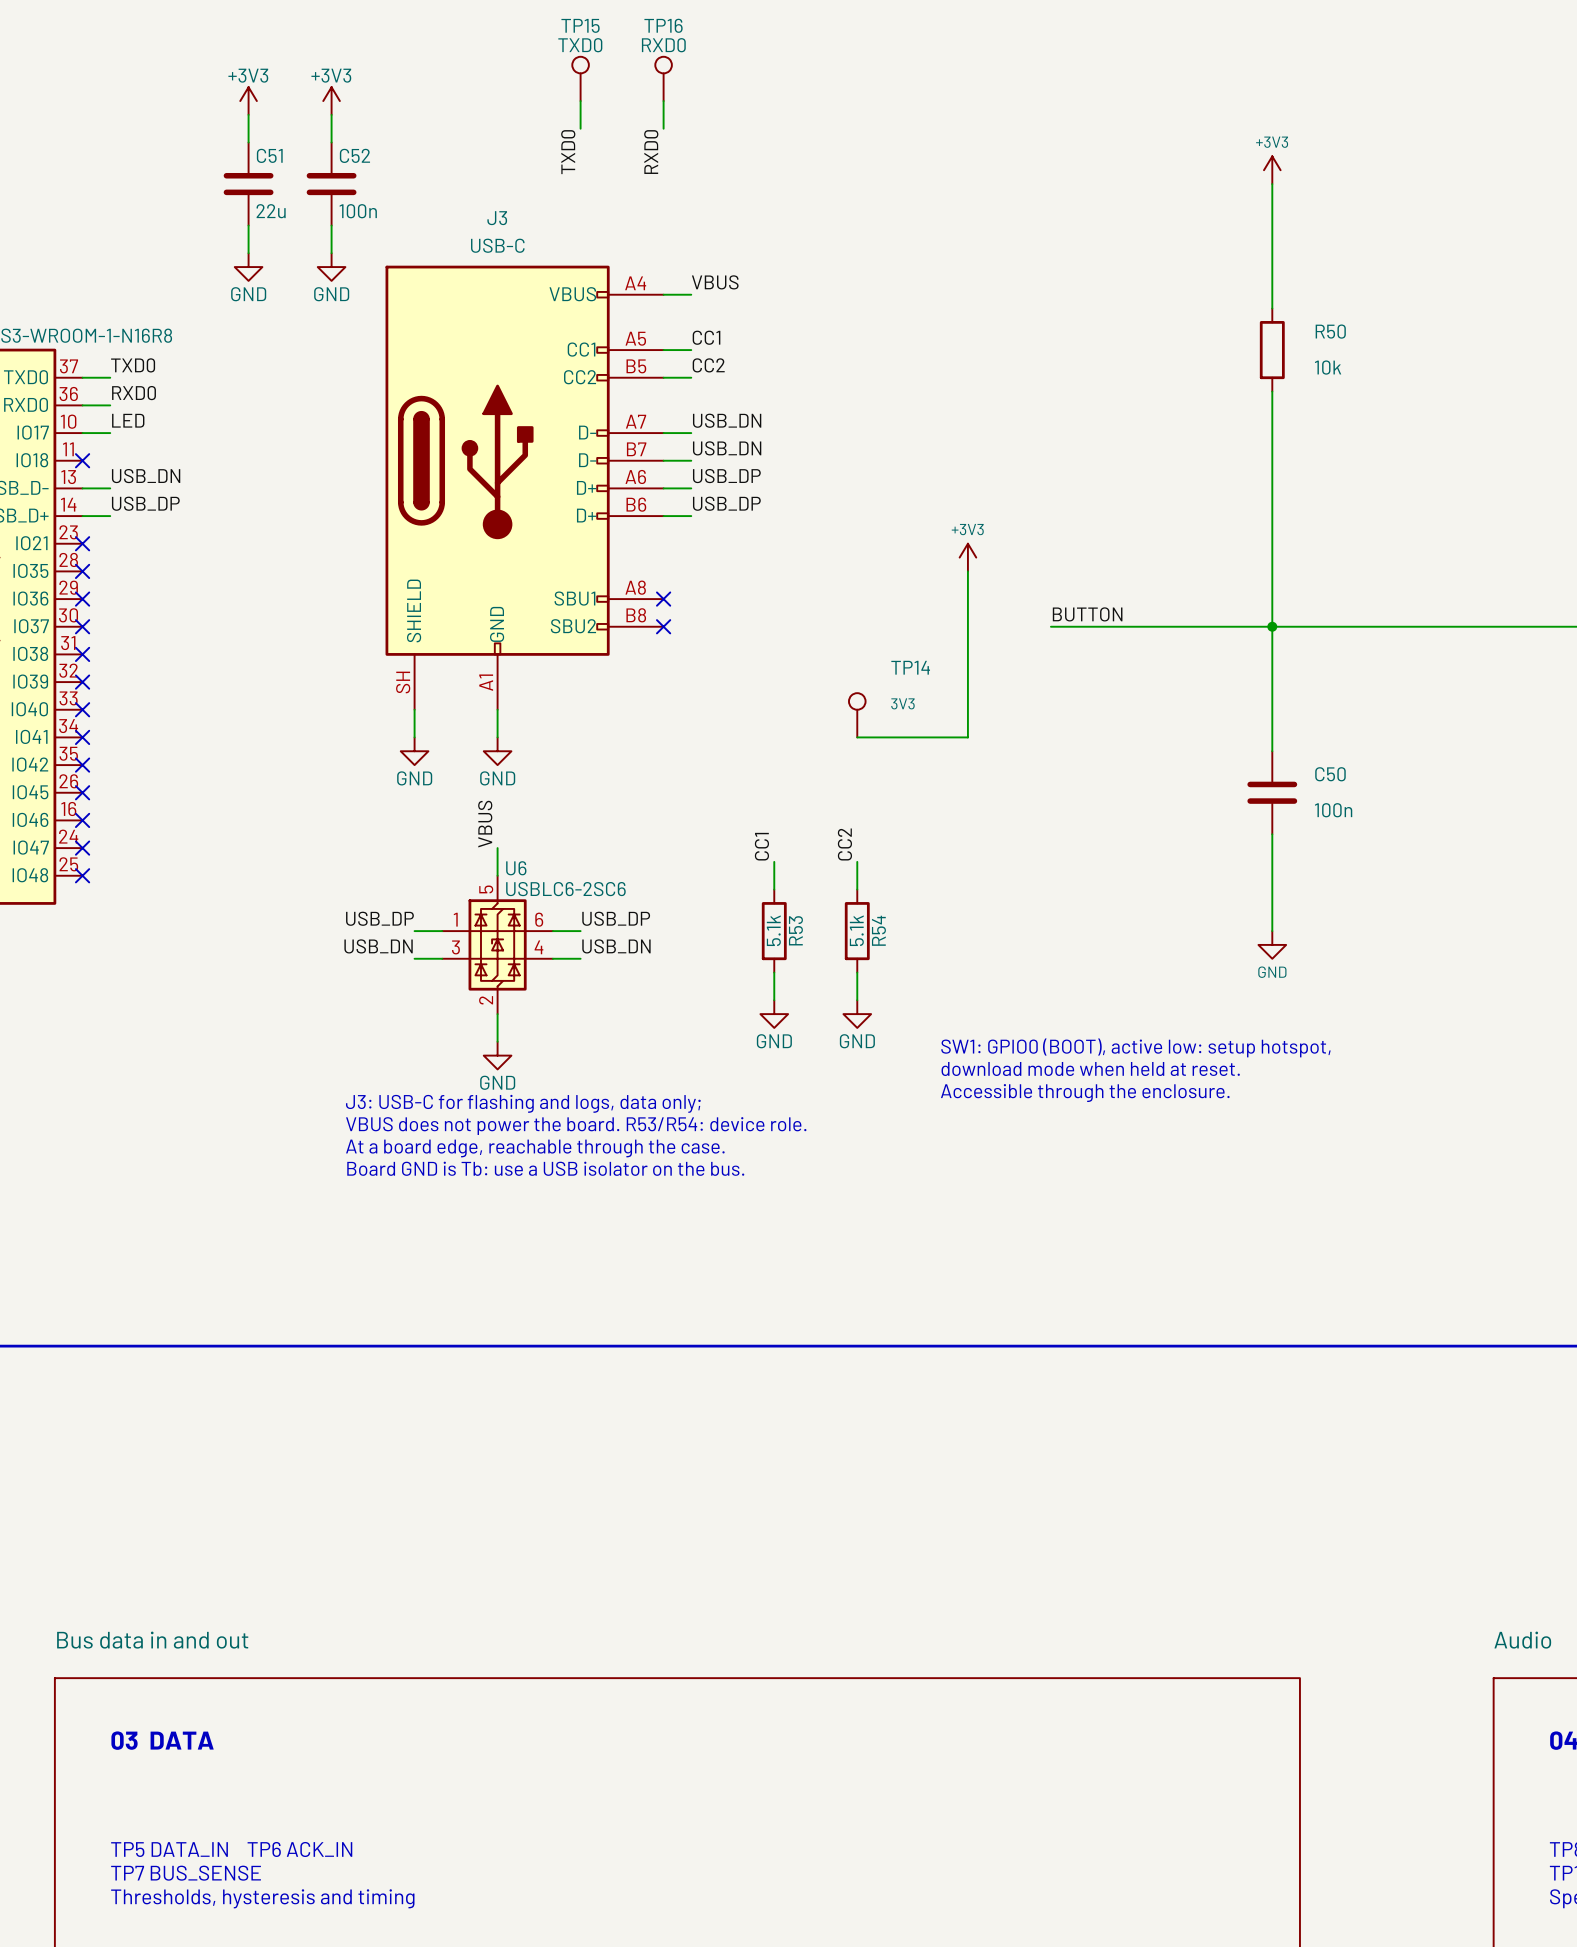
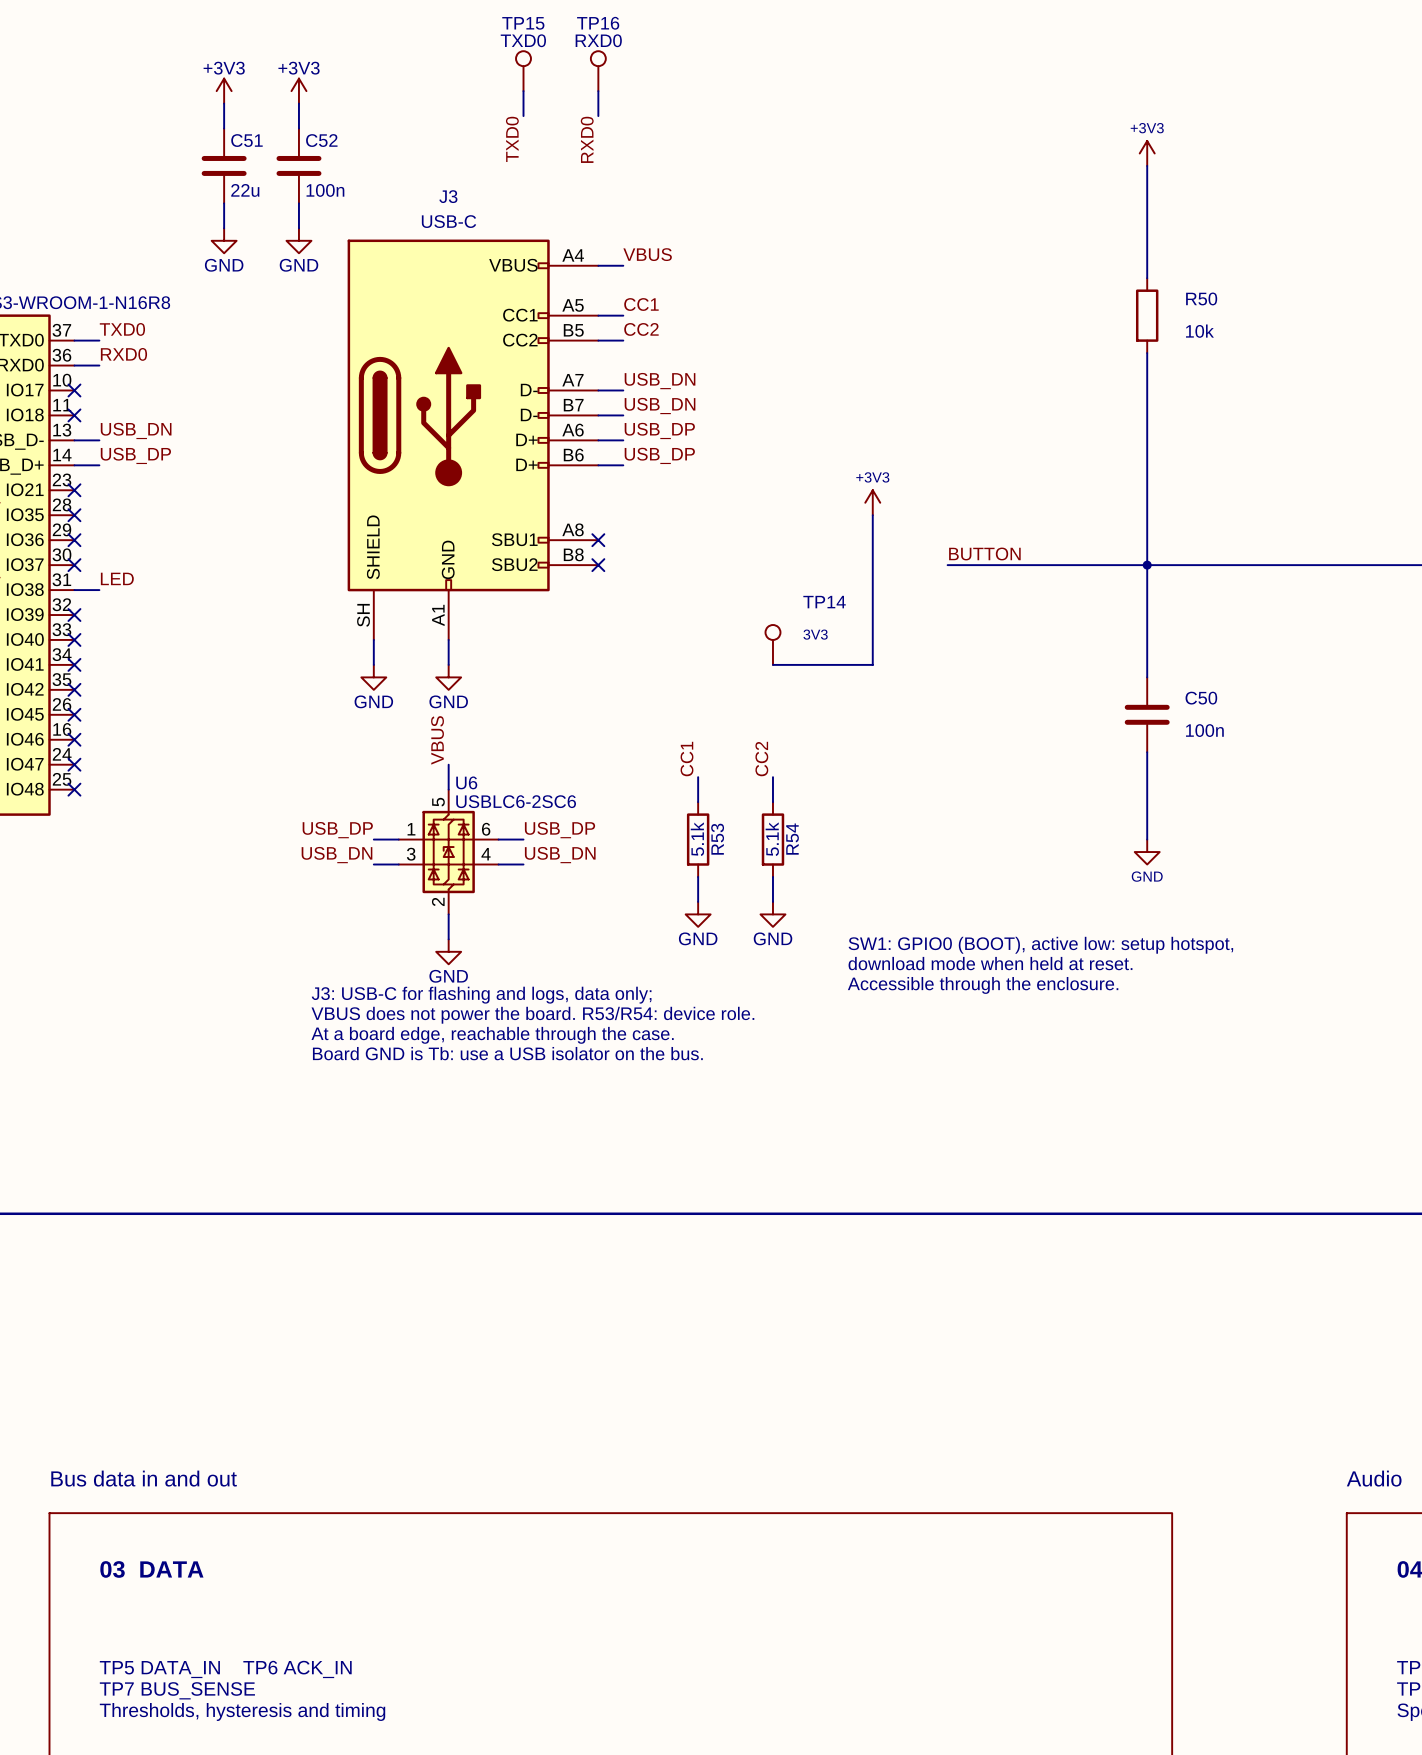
label position: LED (128, 420) -> LED (117, 578)
wire: (82, 433) (110, 433) -> (74, 590) (99, 590)
no-connect mark: none -> (74, 390)
no-connect mark: (82, 654) -> none

